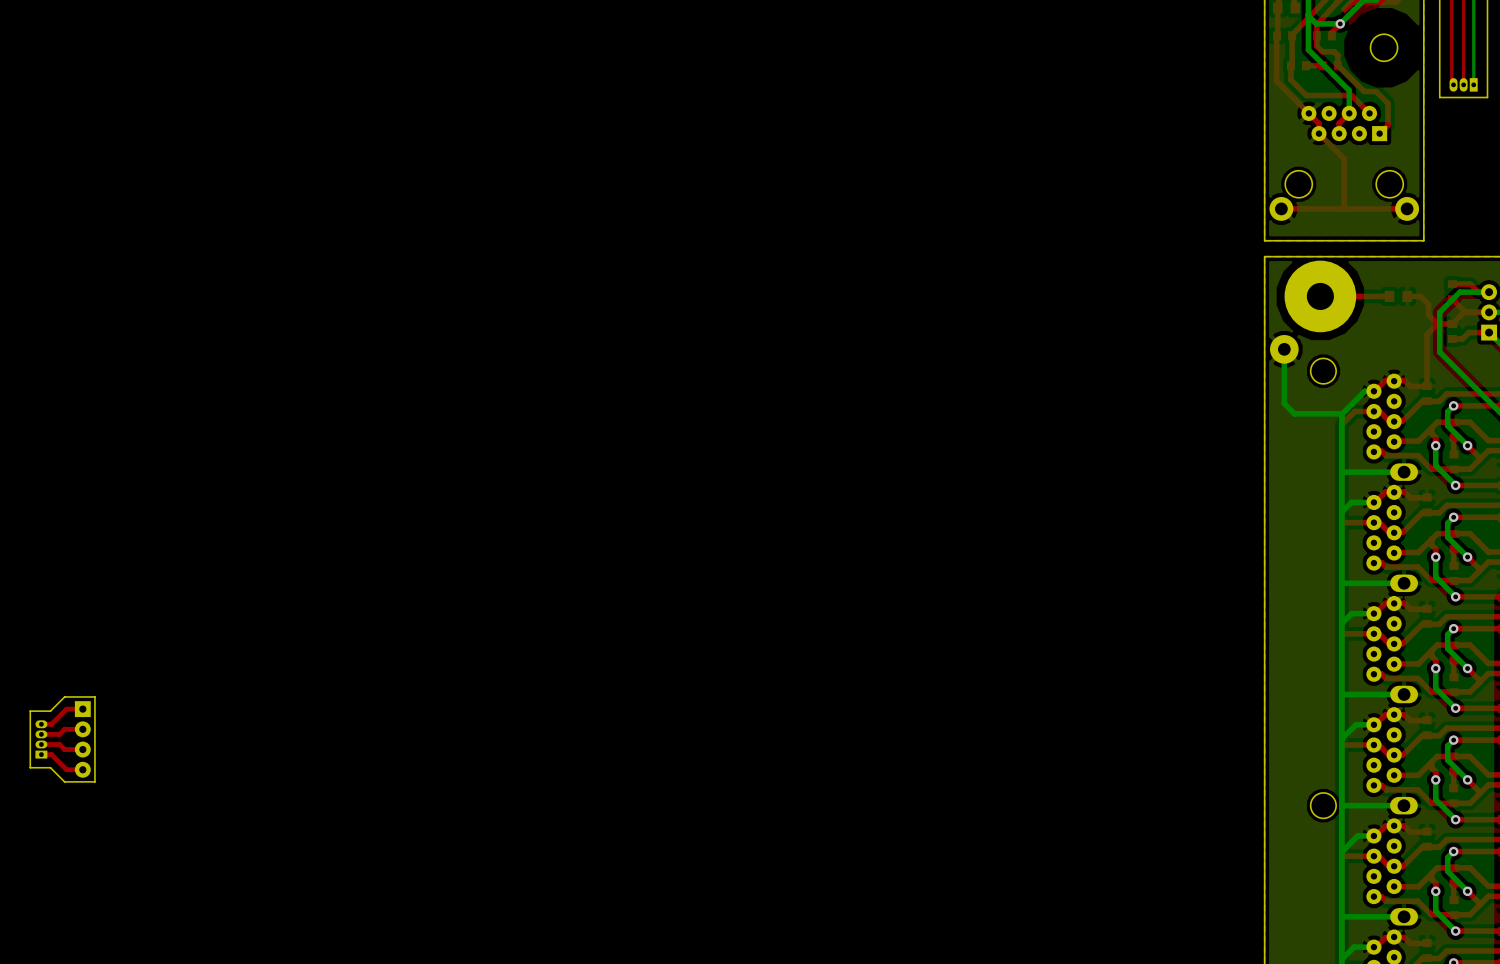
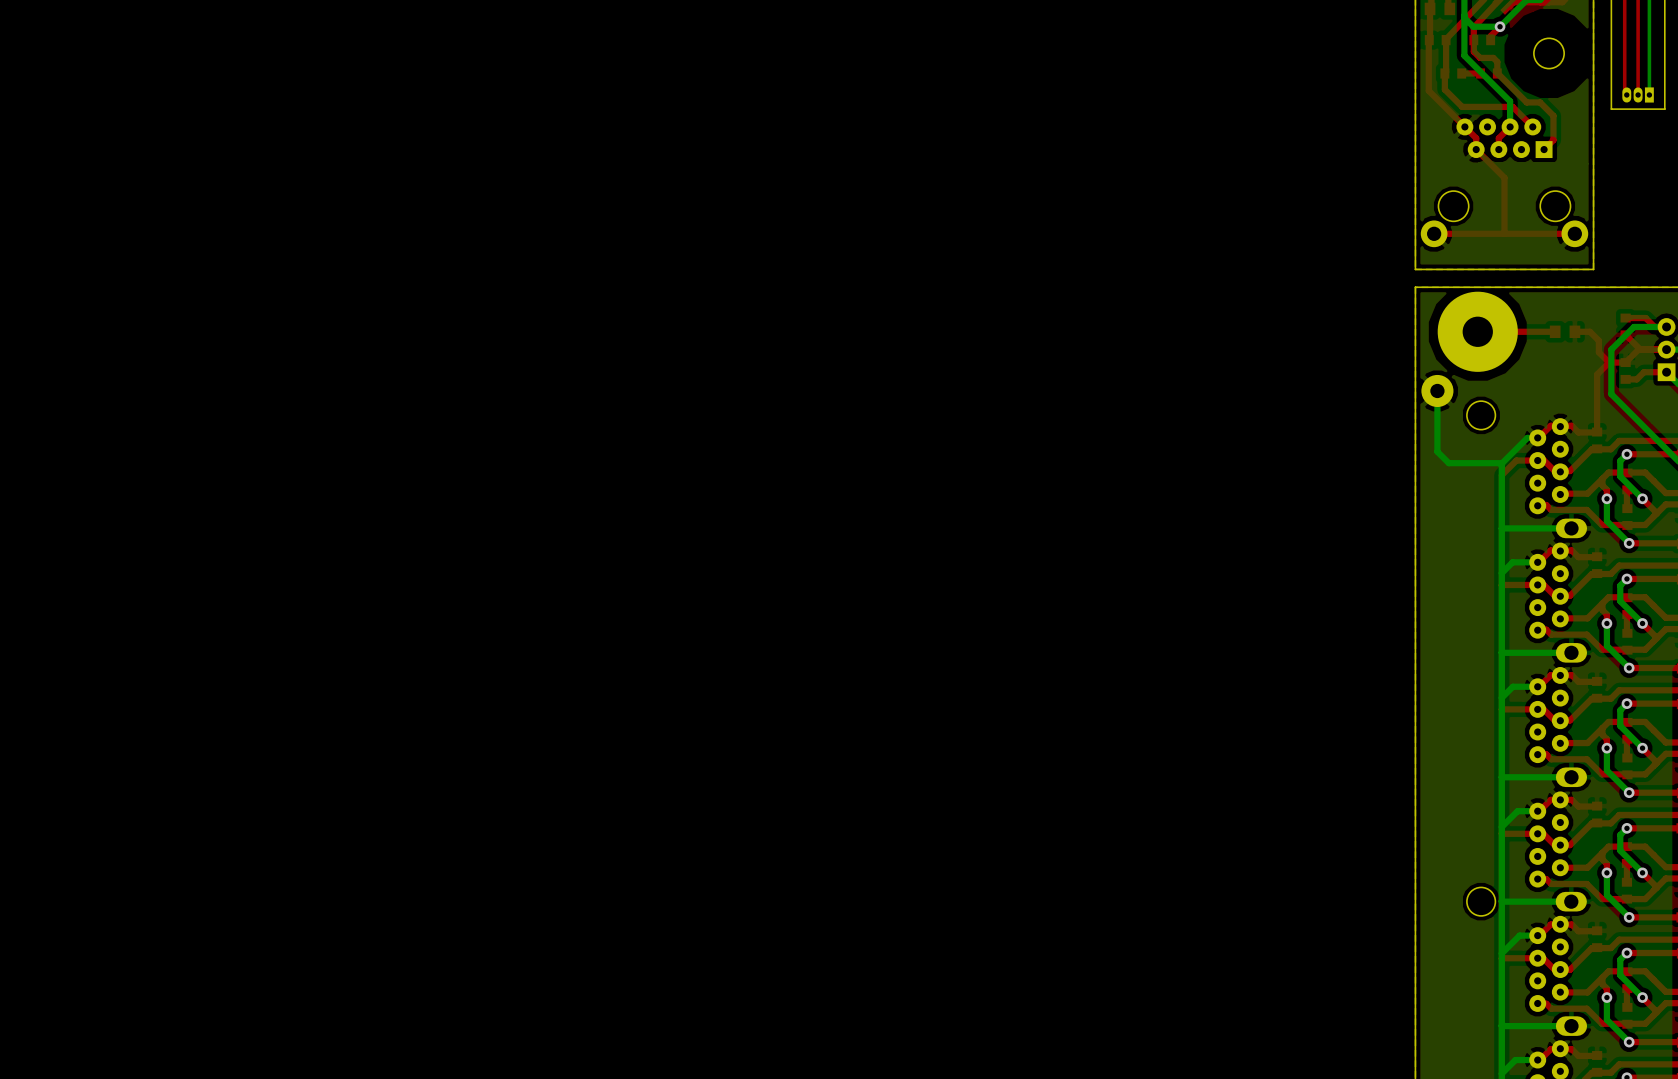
board edge: (94, 696) (64, 696) (50, 711) (30, 711) (30, 767) (50, 767) (64, 781) (94, 781) (94, 696) -> none
top track: (82, 709) (66, 709) (51, 724) (41, 724) -> none
top track: (82, 729) (64, 729) (59, 734) (41, 734) -> none
part: (41, 739) -> none
part: (82, 739) -> none
top track: (41, 744) (59, 744) (64, 749) (82, 749) -> none
top track: (41, 754) (51, 754) (66, 769) (82, 769) -> none

